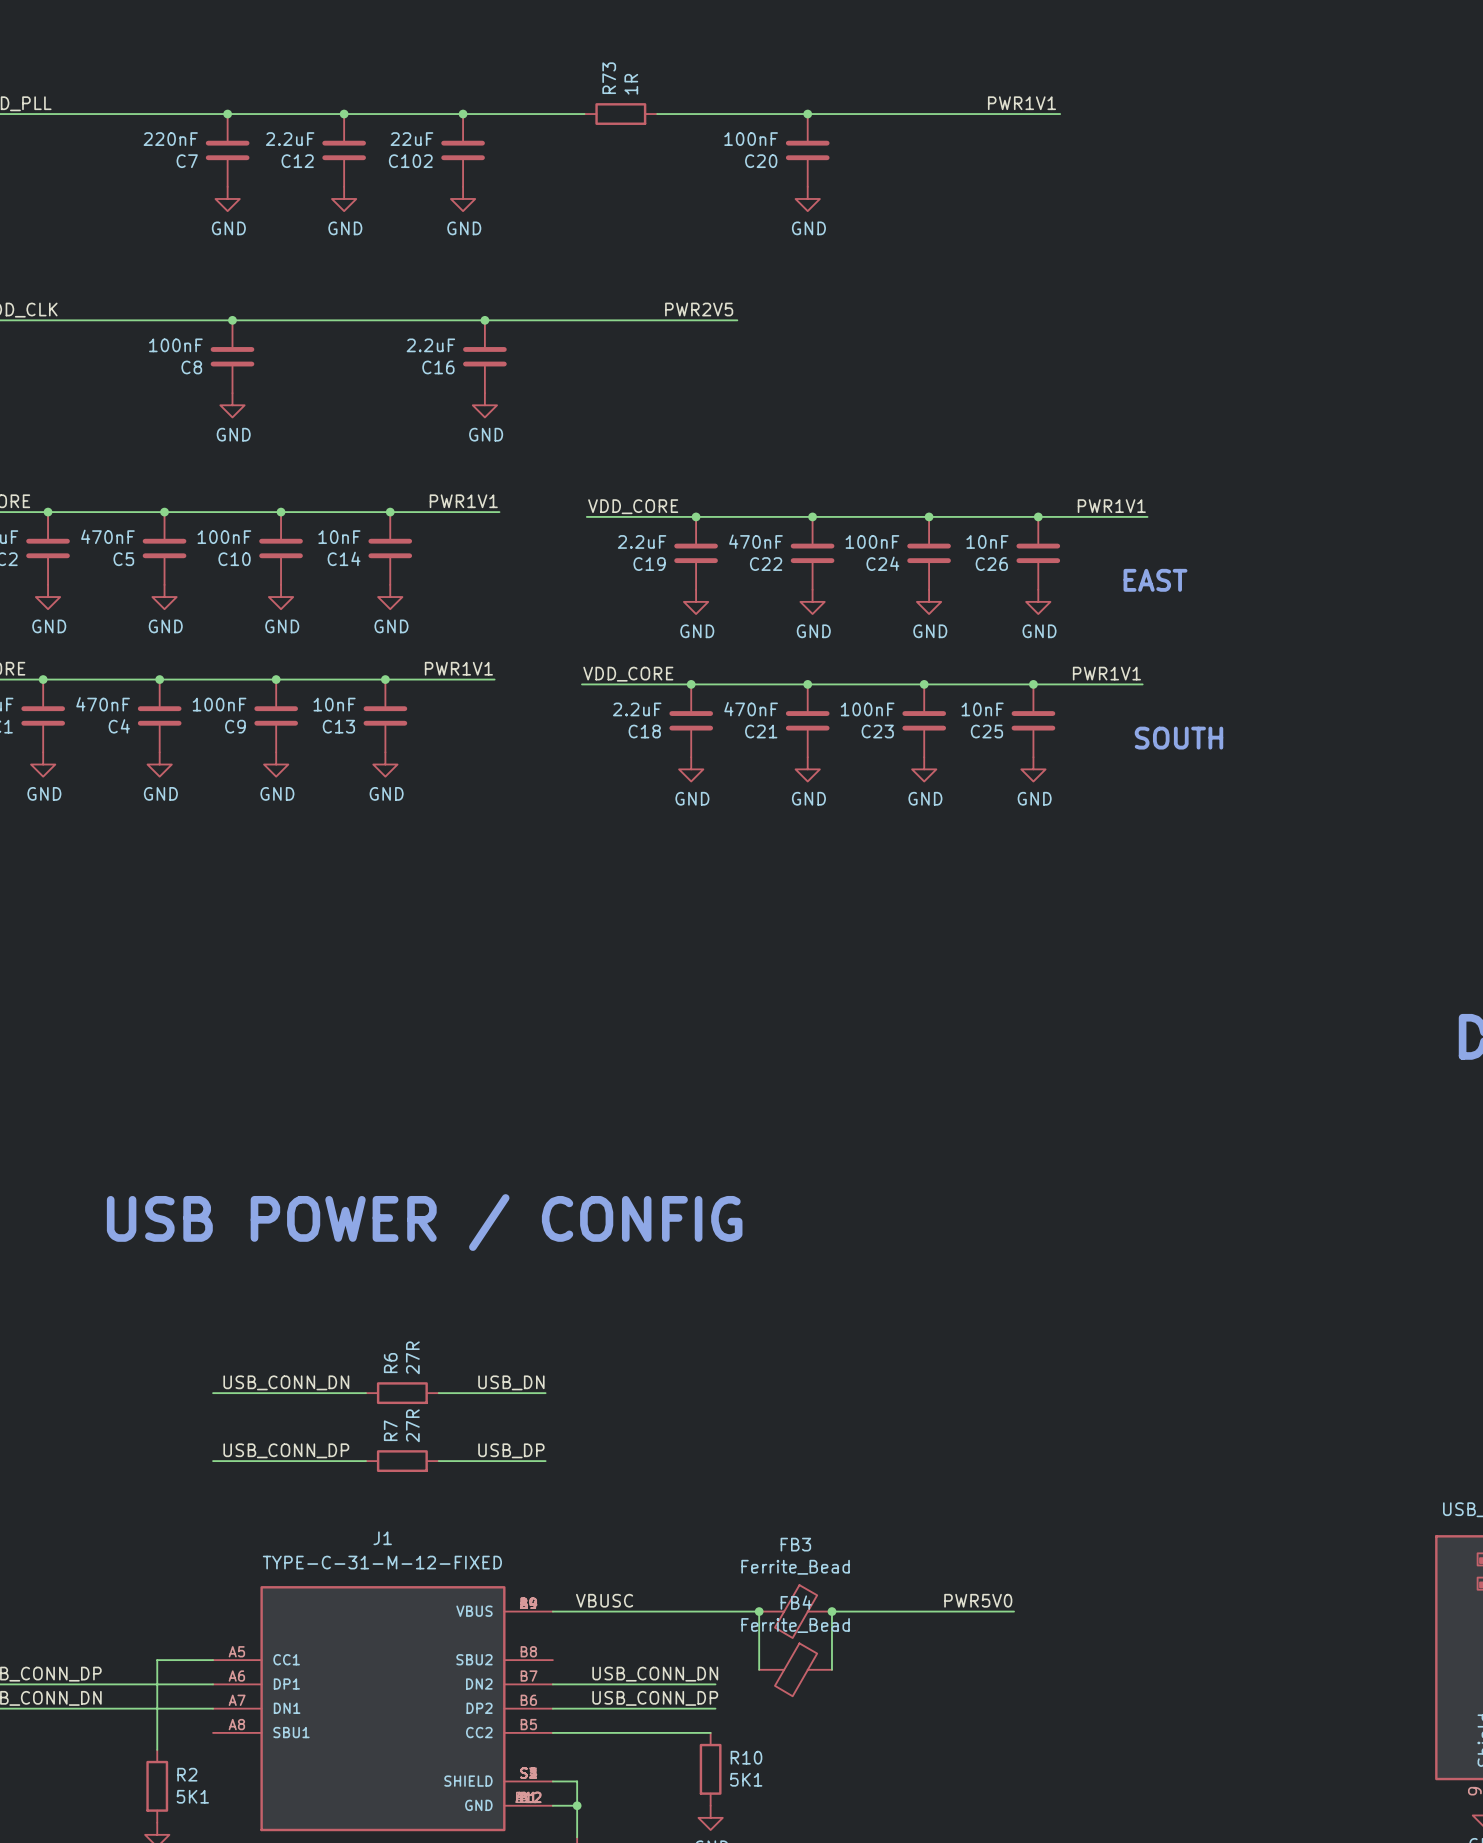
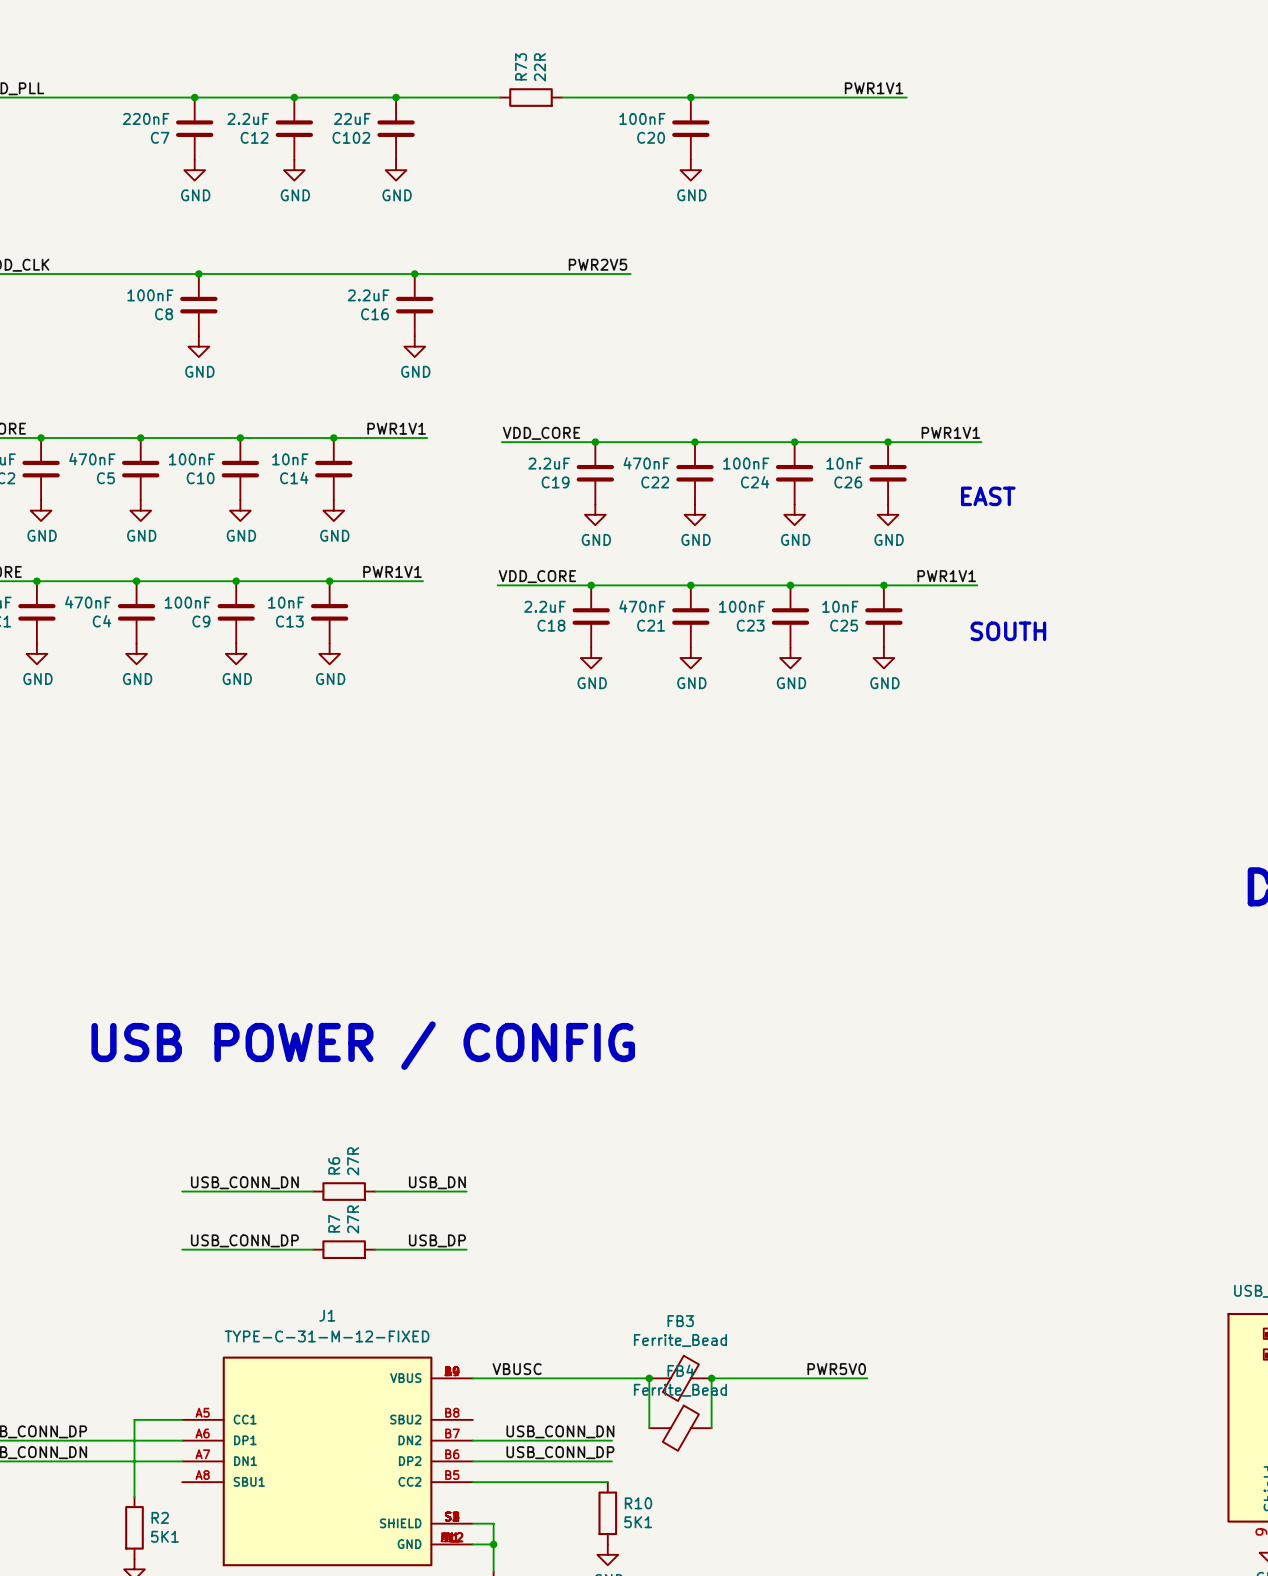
R73 value: 1R (631, 84) -> 22R (539, 67)

